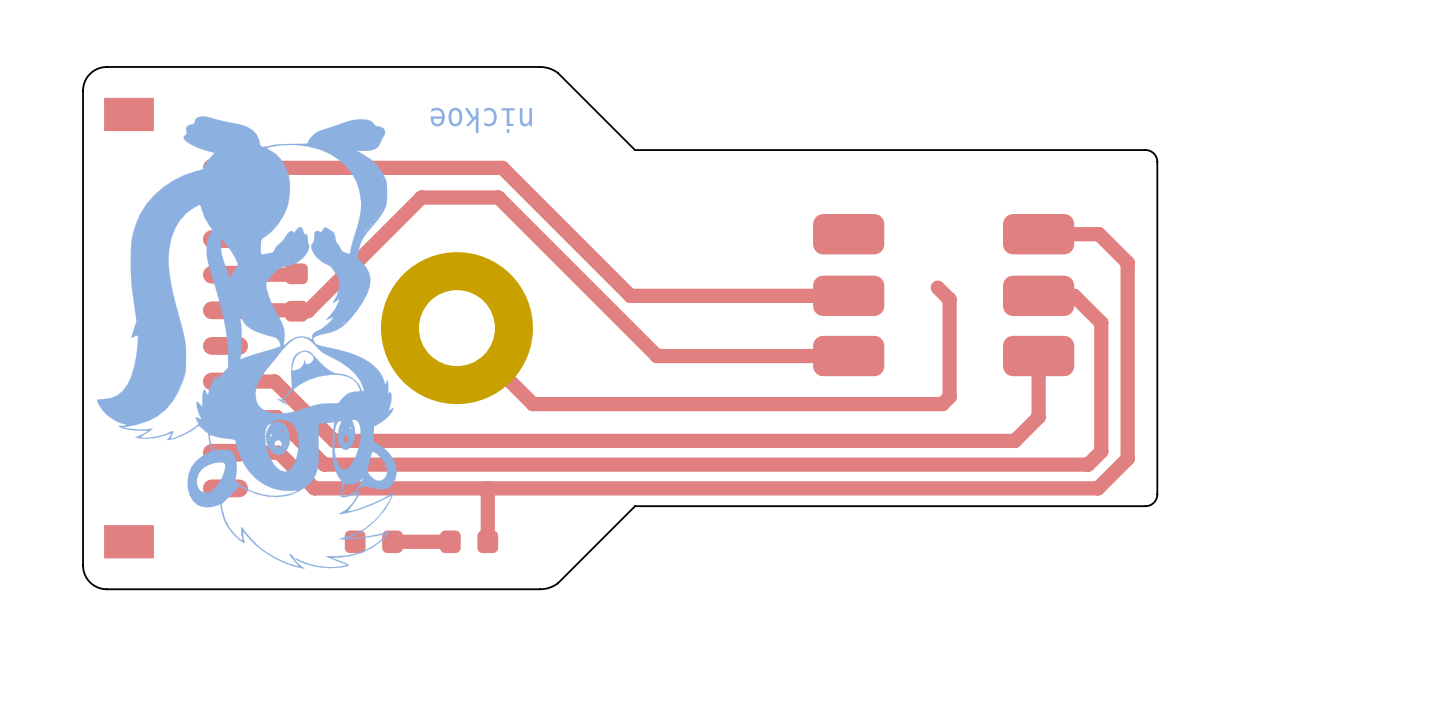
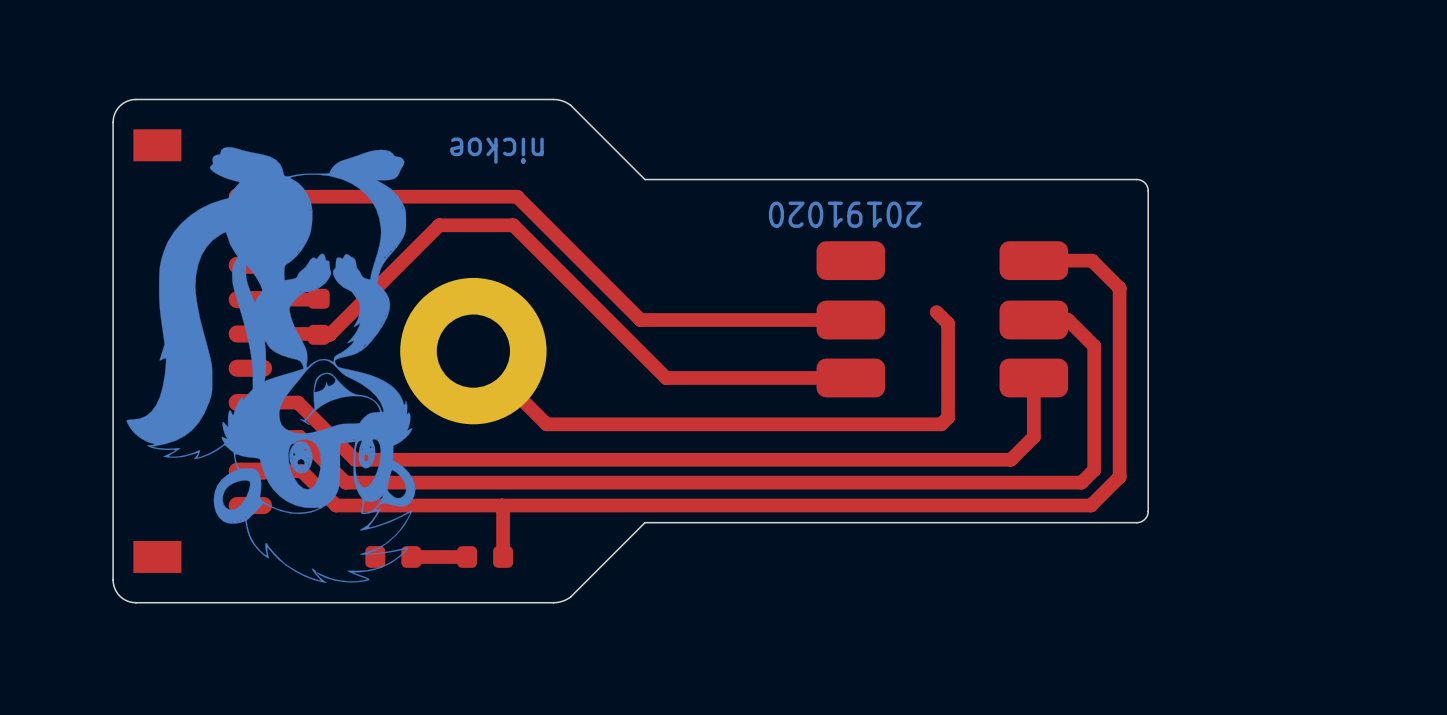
text: none -> 20191020 (845, 214)

